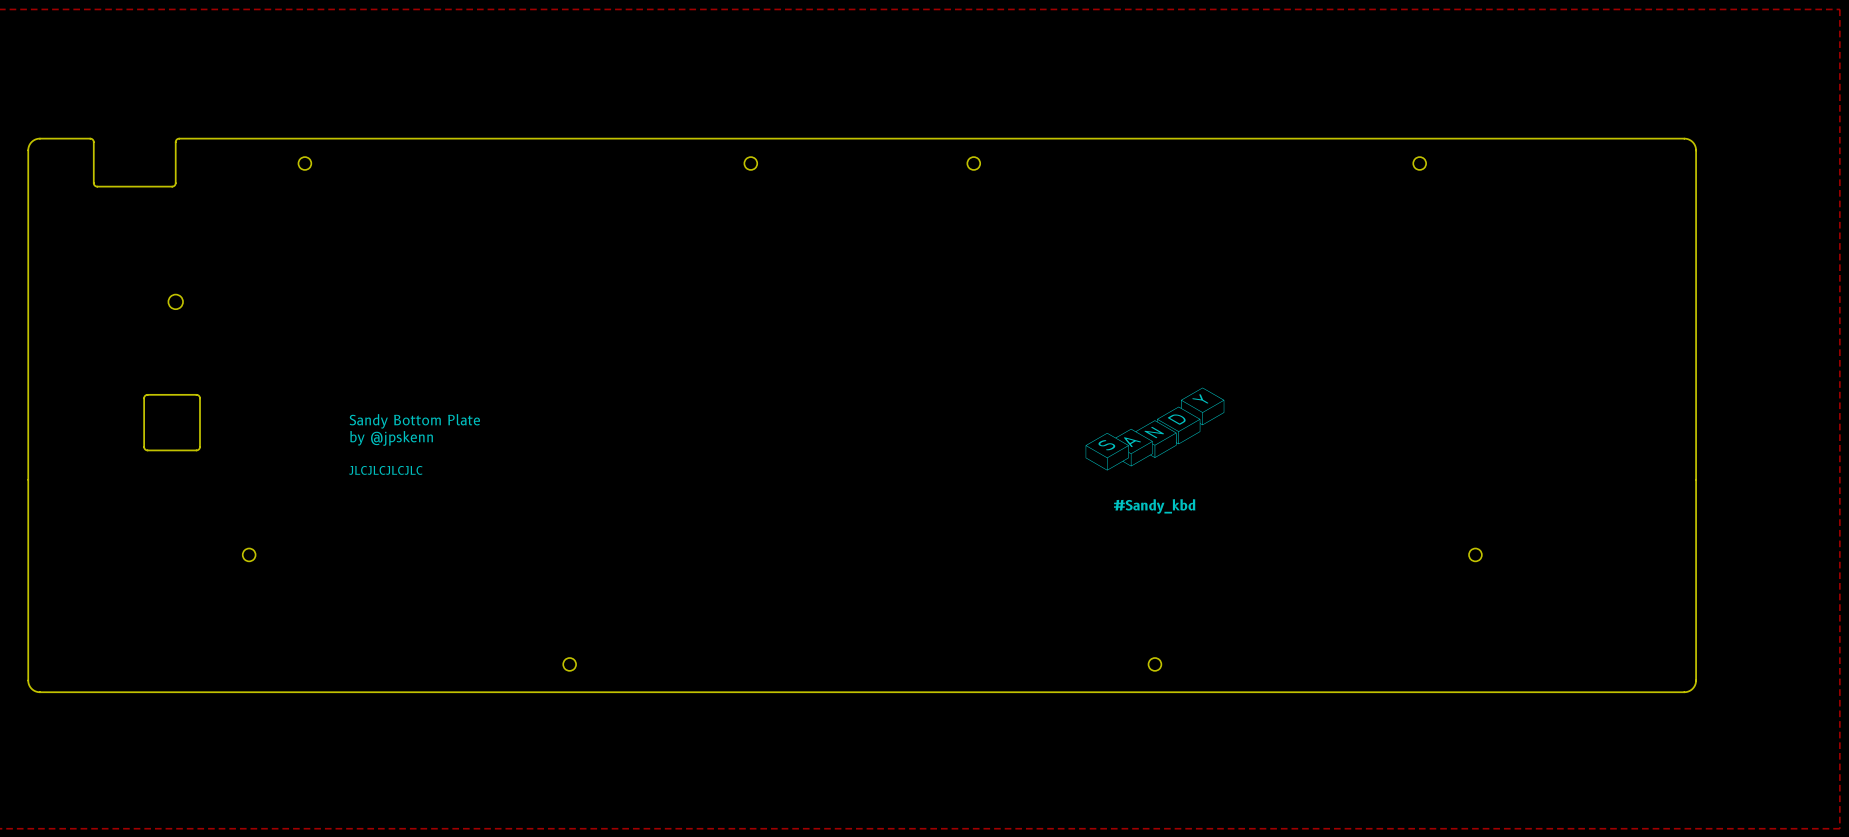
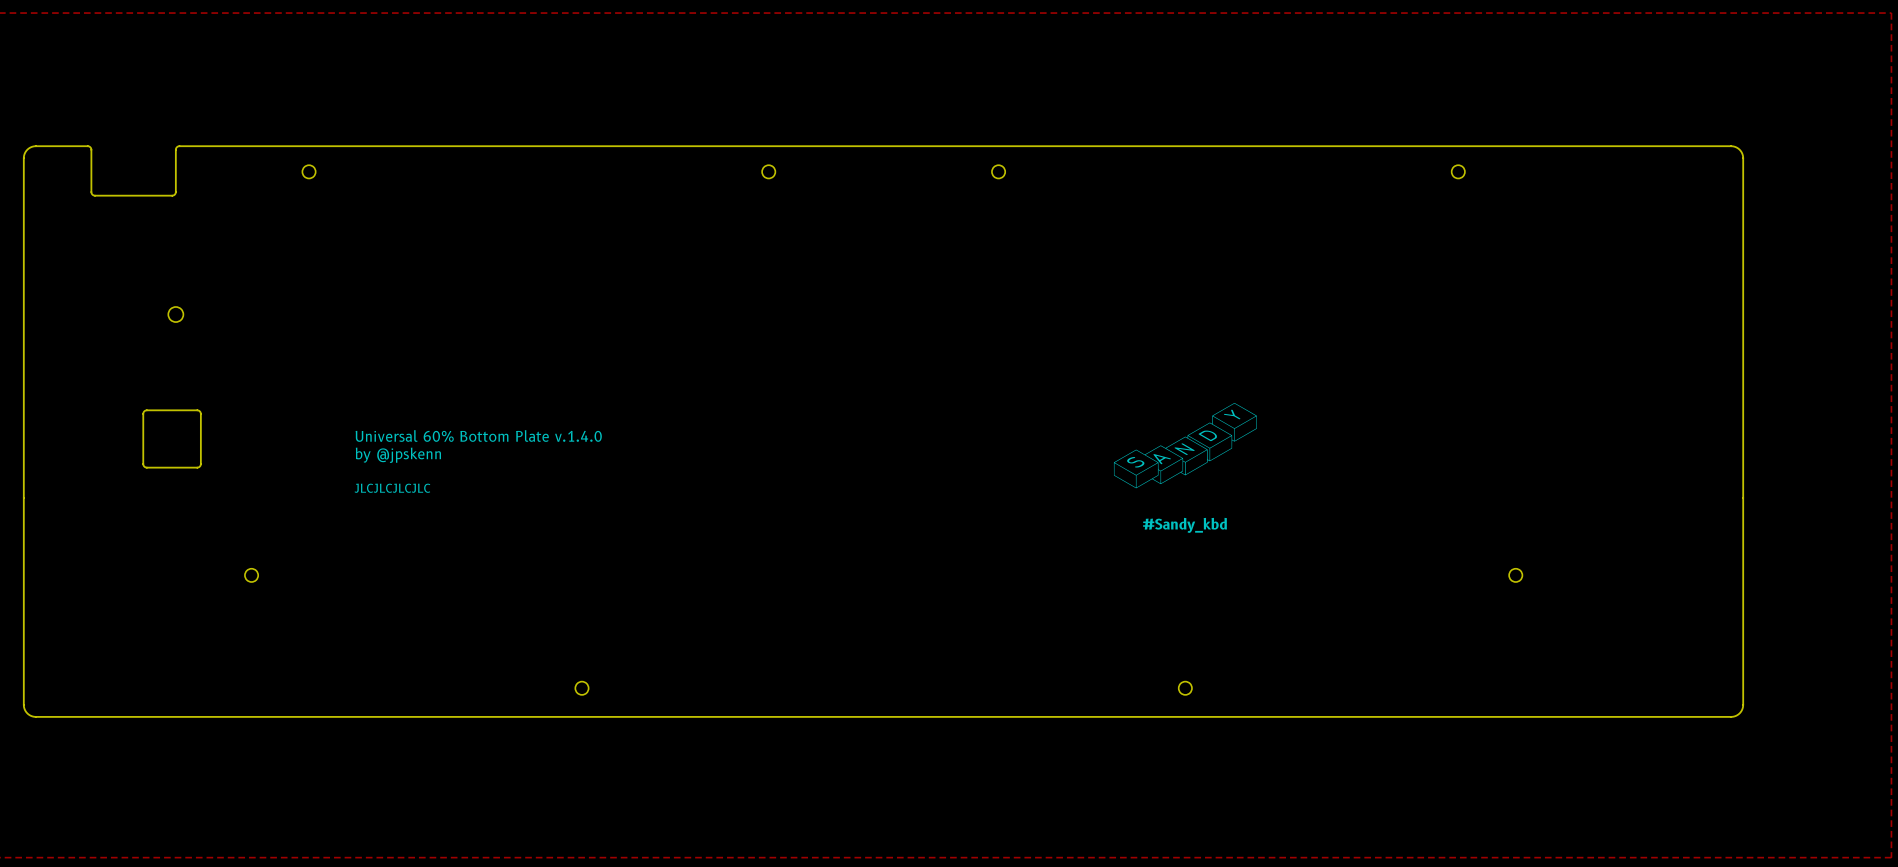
text: Sandy Bottom Plate (414, 421) -> Universal 60% Bottom Plate v.1.4.0 (478, 436)

